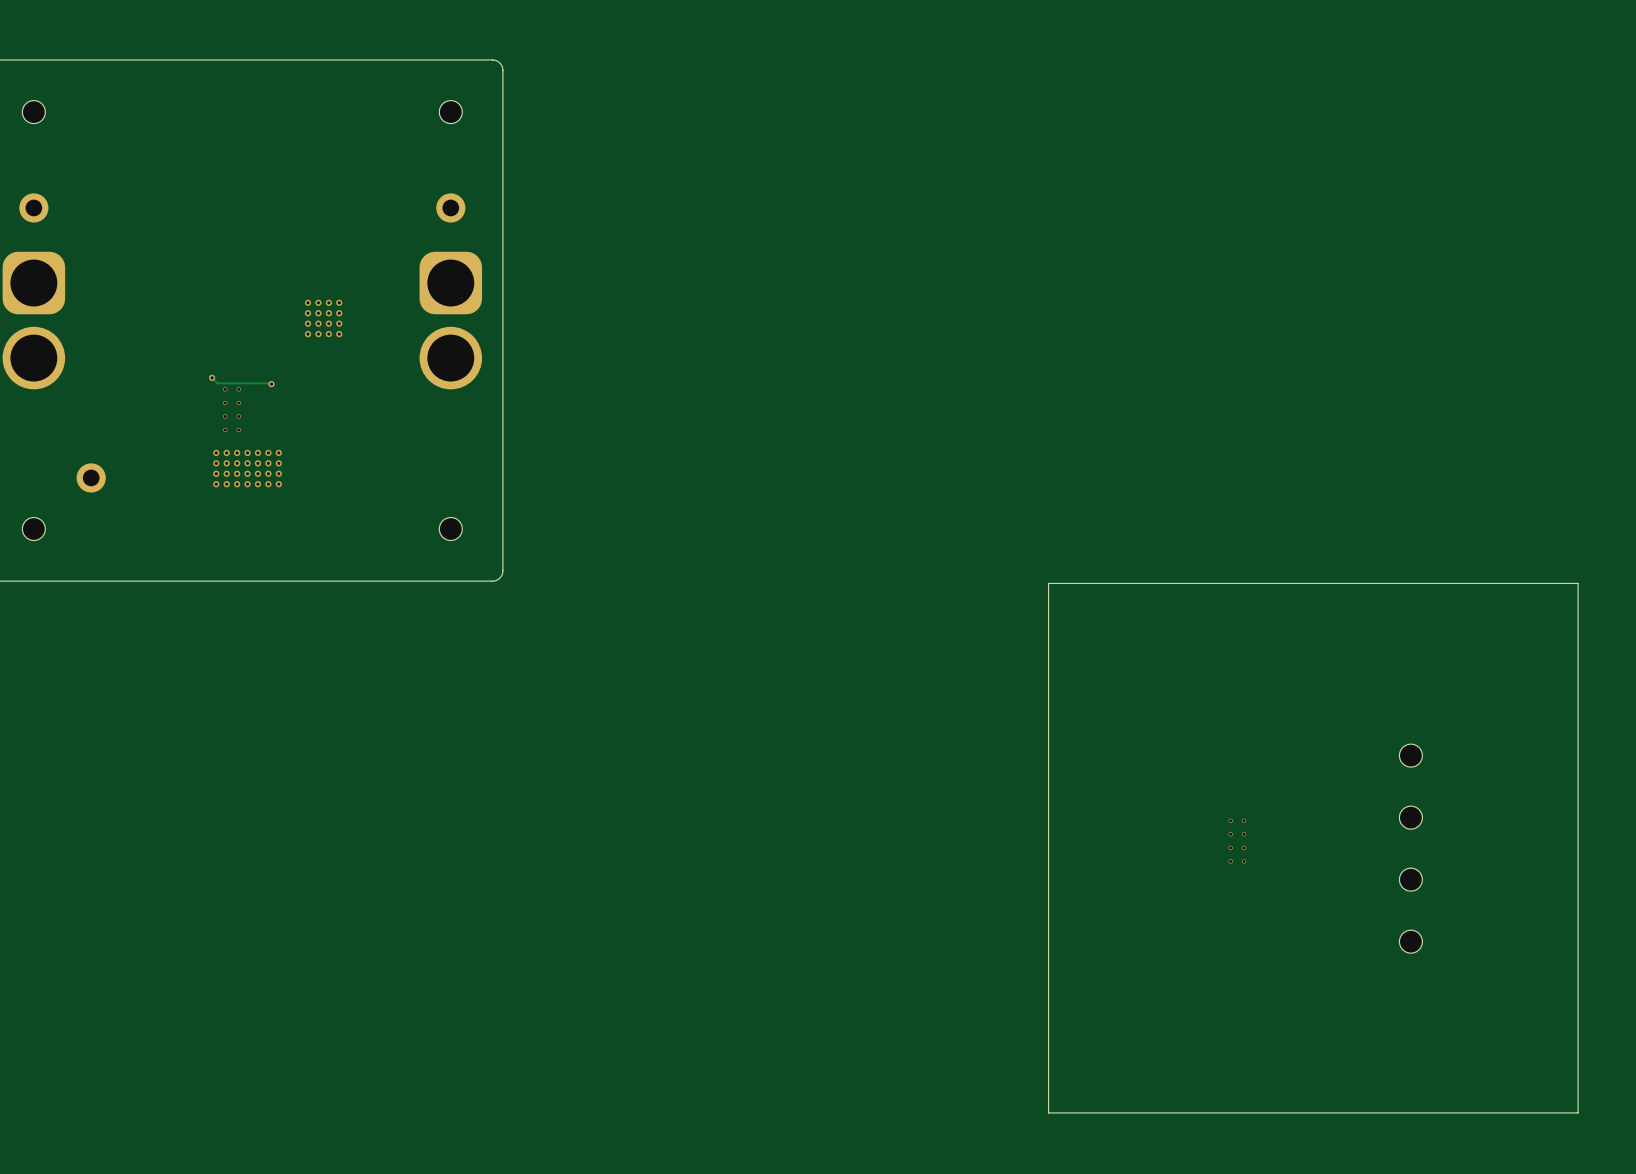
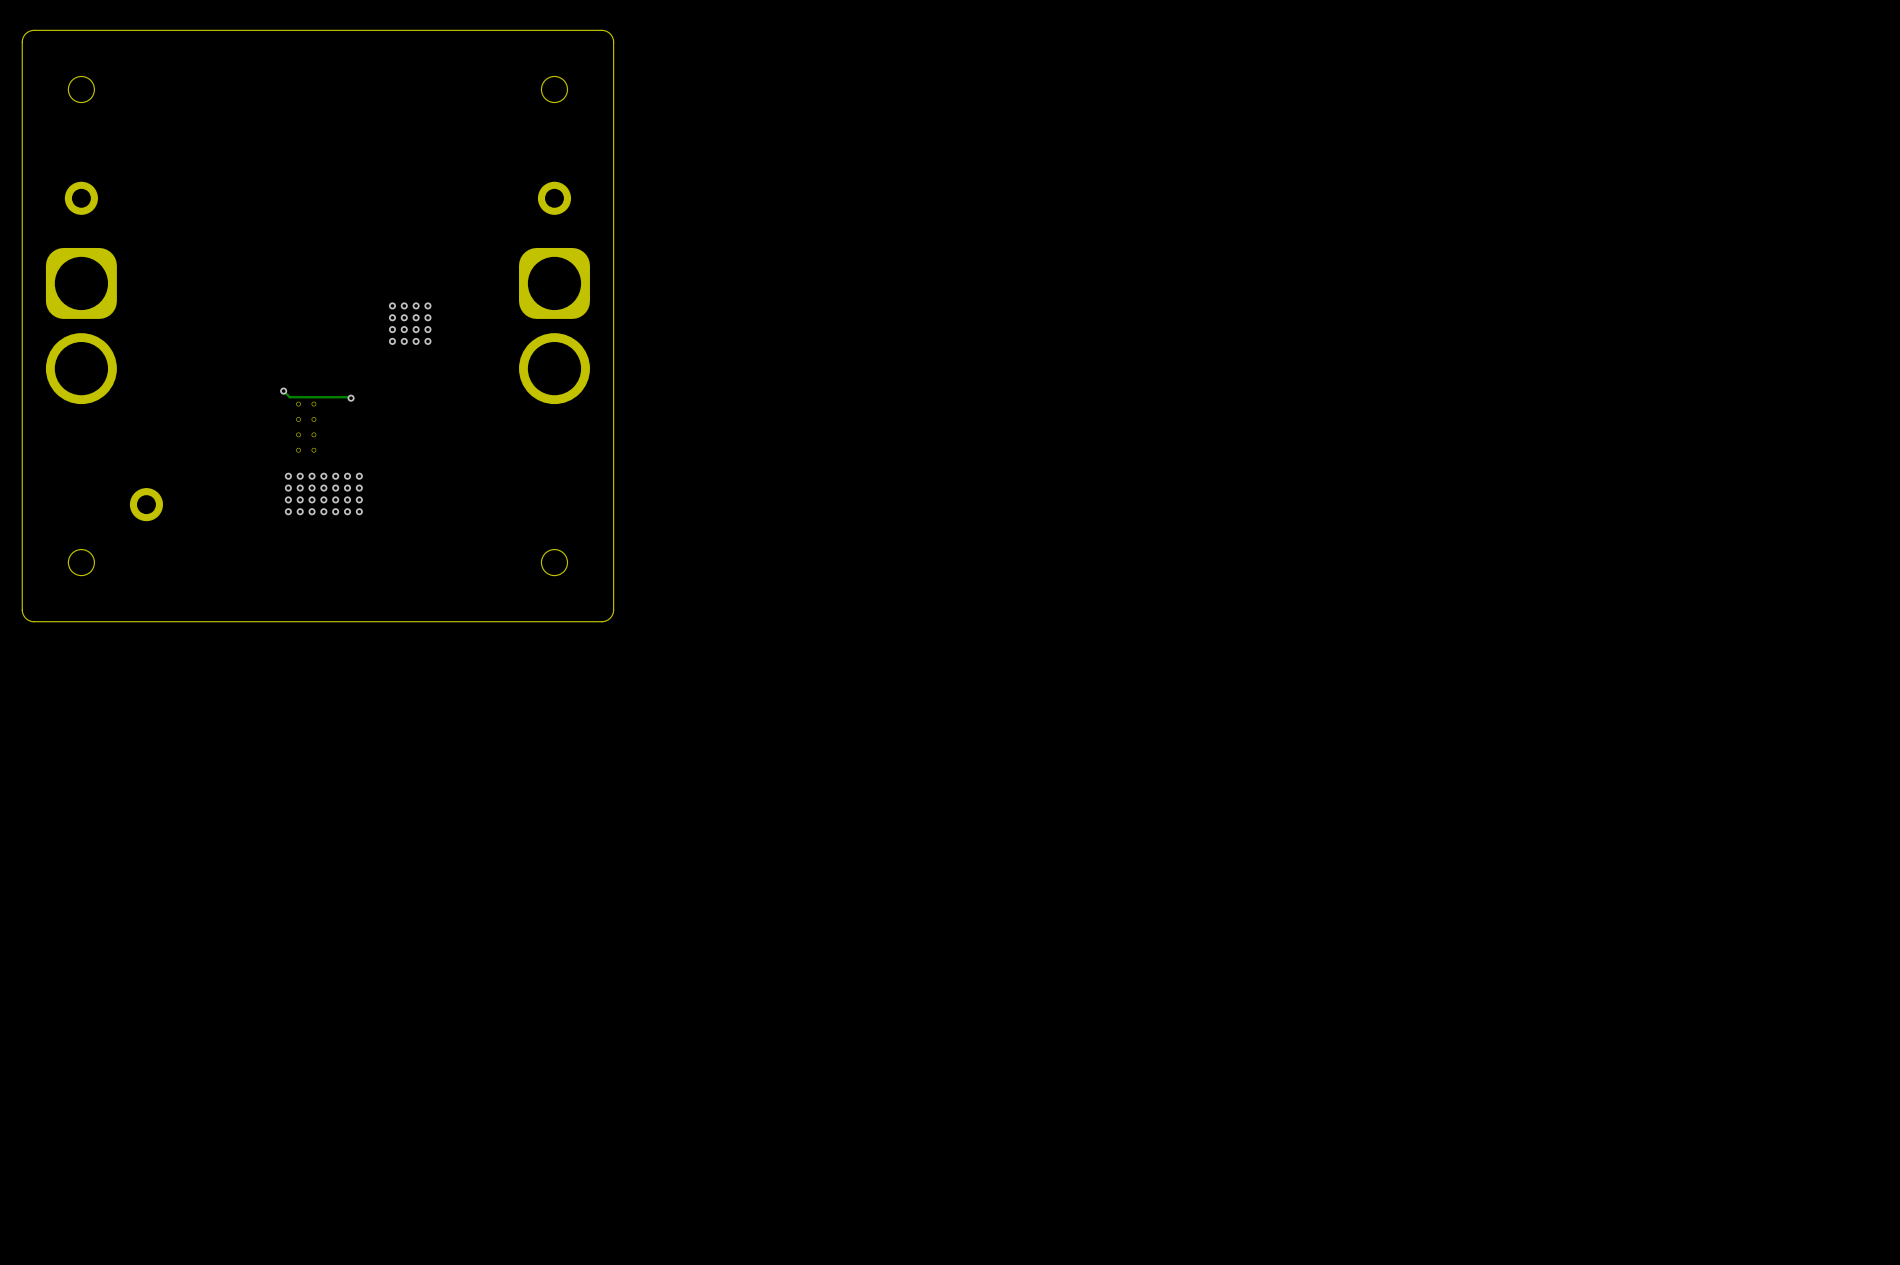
board edge: (1578, 583) (1048, 583) (1048, 1112) (1578, 1112) (1578, 583) -> none
part: (1410, 755) -> none
part: (1410, 817) -> none
part: (1237, 841) -> none
part: (1410, 879) -> none
part: (1410, 941) -> none

